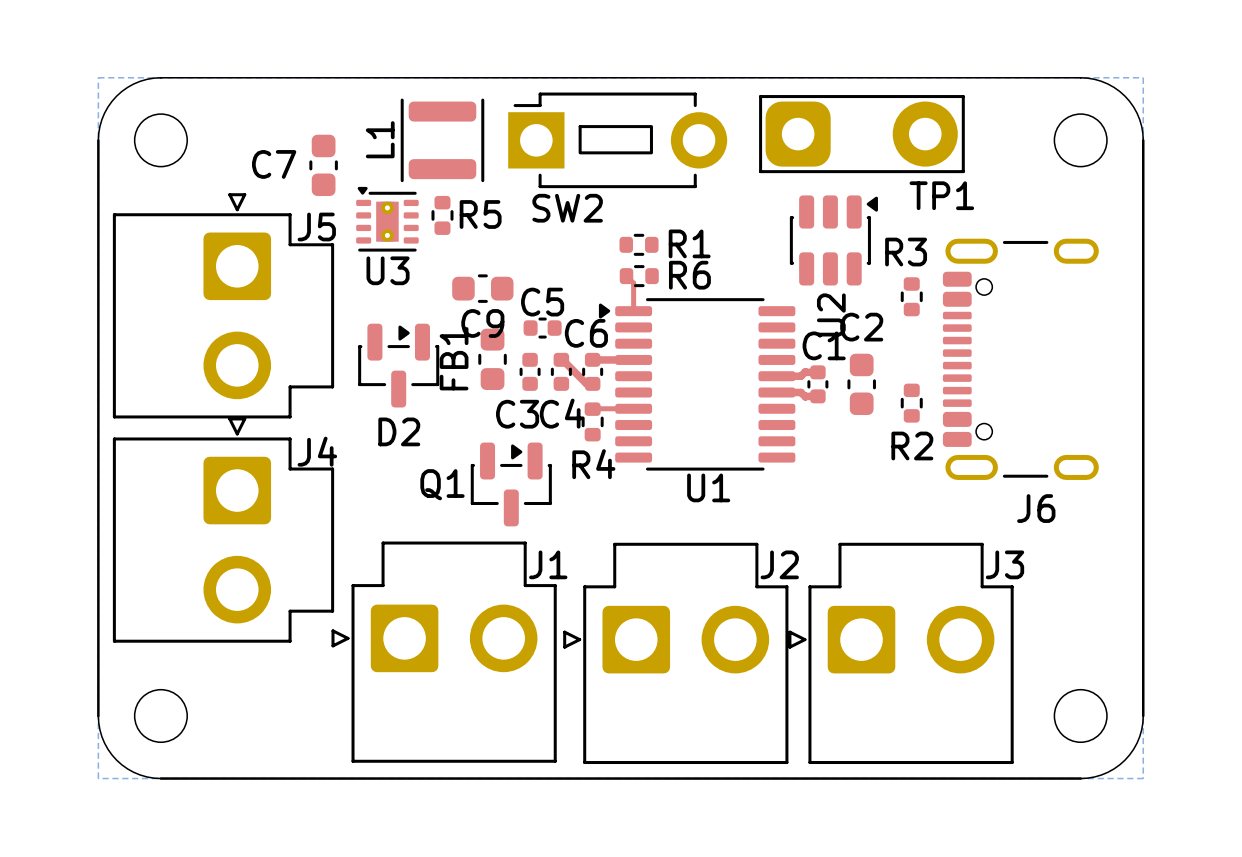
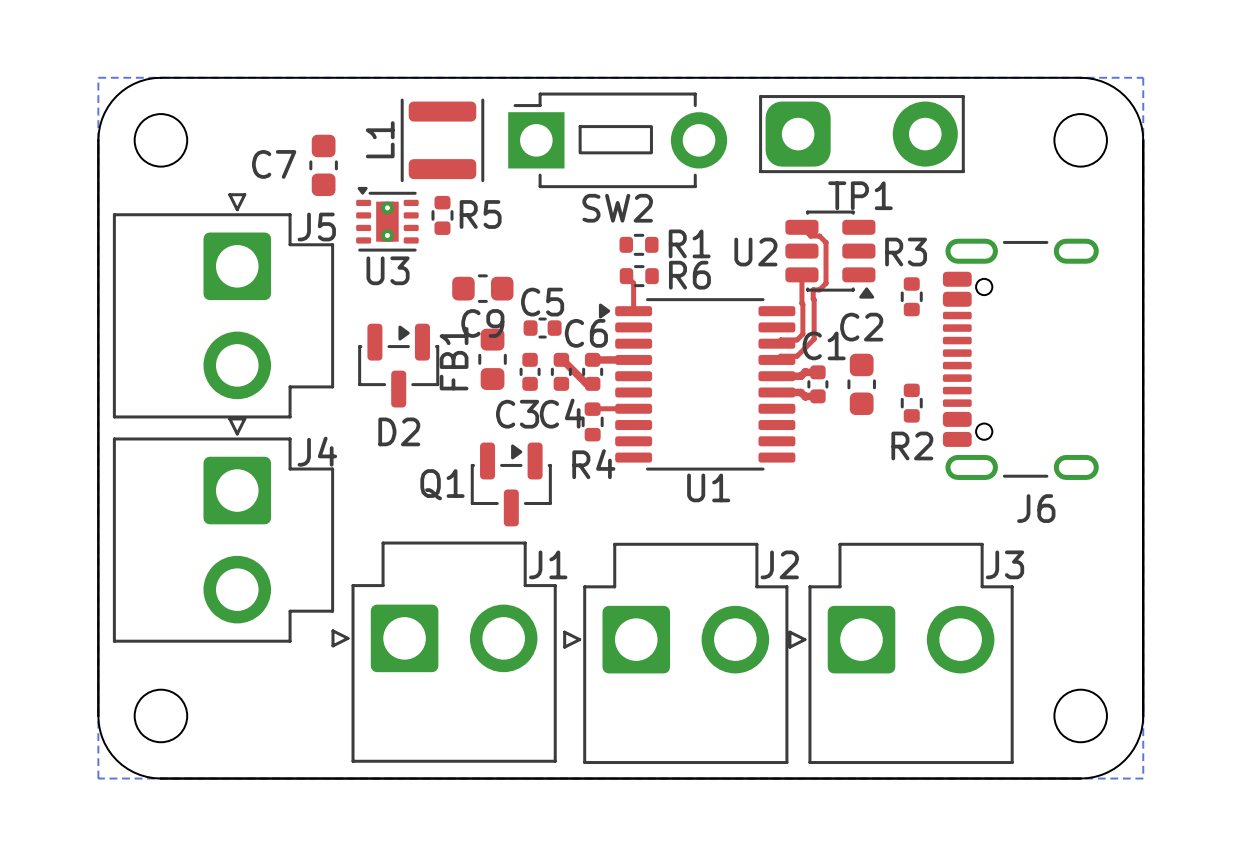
TP1 name position: TP1 (941, 195) -> TP1 (860, 195)
SW2 name position: SW2 (567, 208) -> SW2 (617, 208)
top track: none -> (801, 227) (810, 236) (819, 236) (826, 242) (826, 283) (819, 289) (813, 289) (814, 339) (797, 356) (780, 356) (776, 359)
U2 rotation: 0° (833, 240) -> 90° clockwise (830, 254)
top track: none -> (801, 274) (802, 334) (797, 339) (781, 339) (777, 343)

